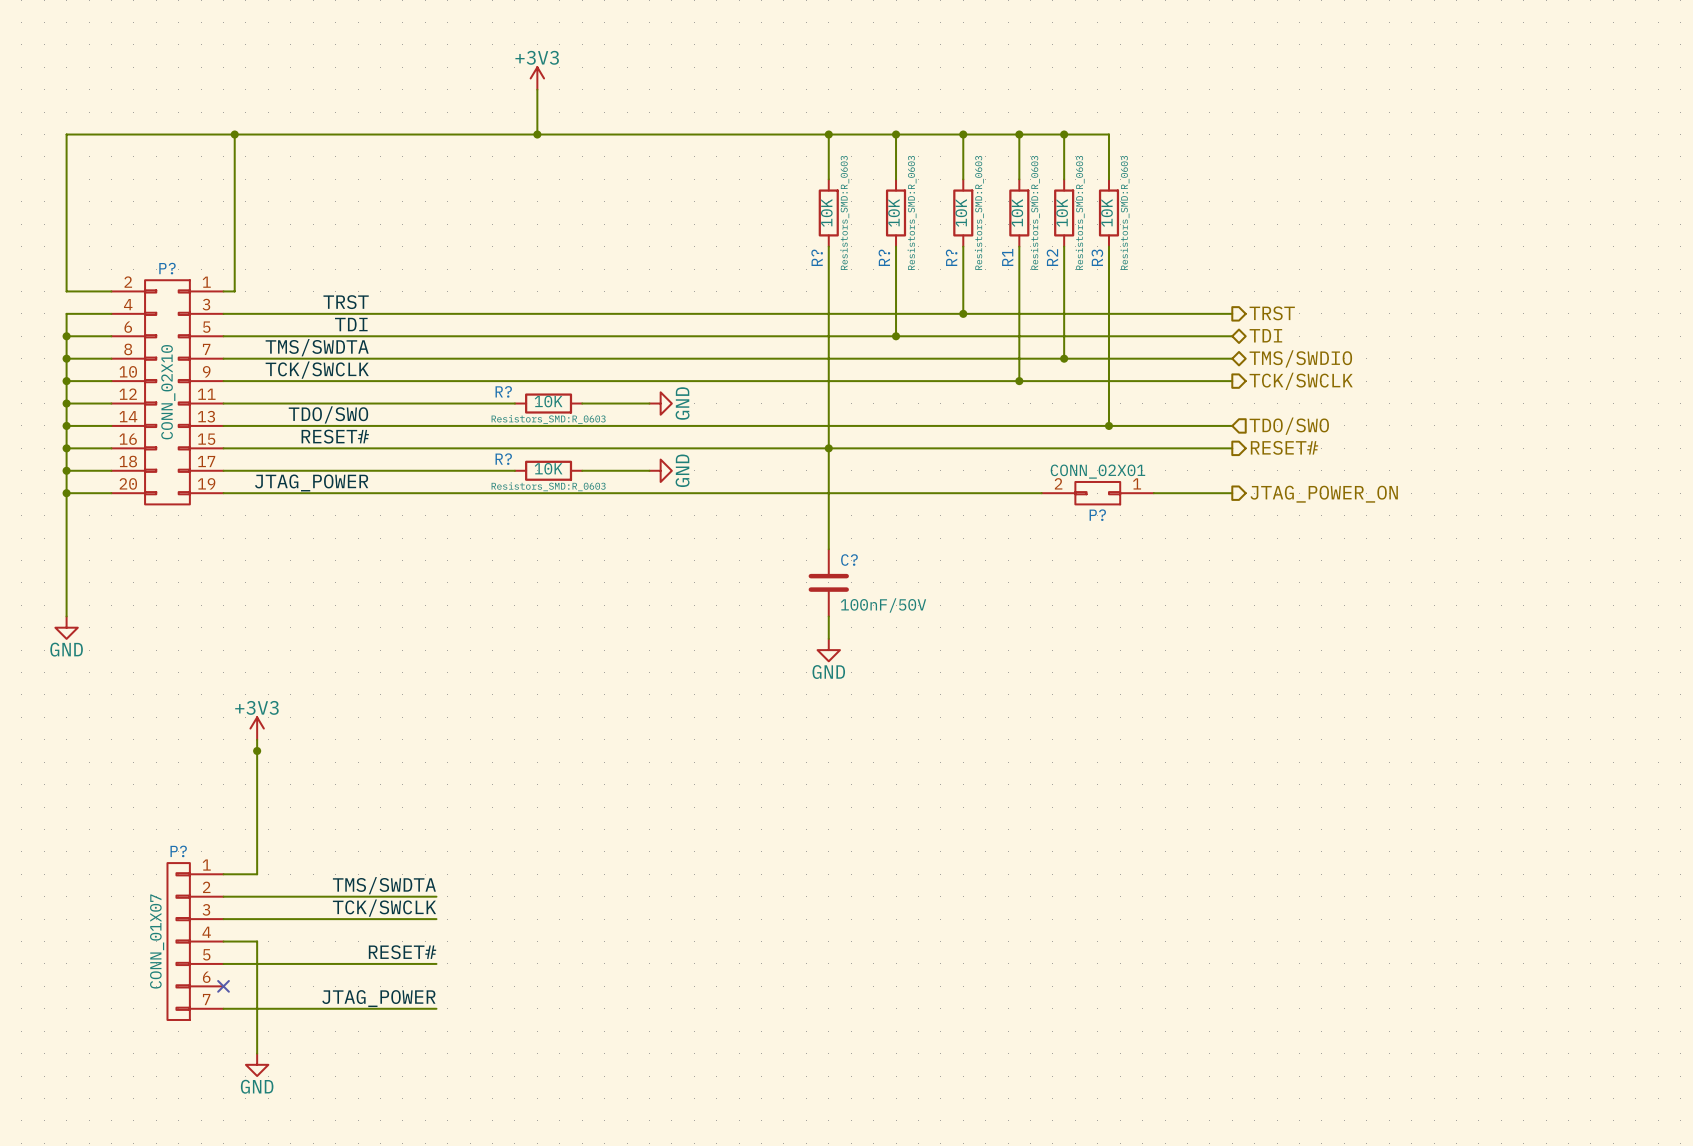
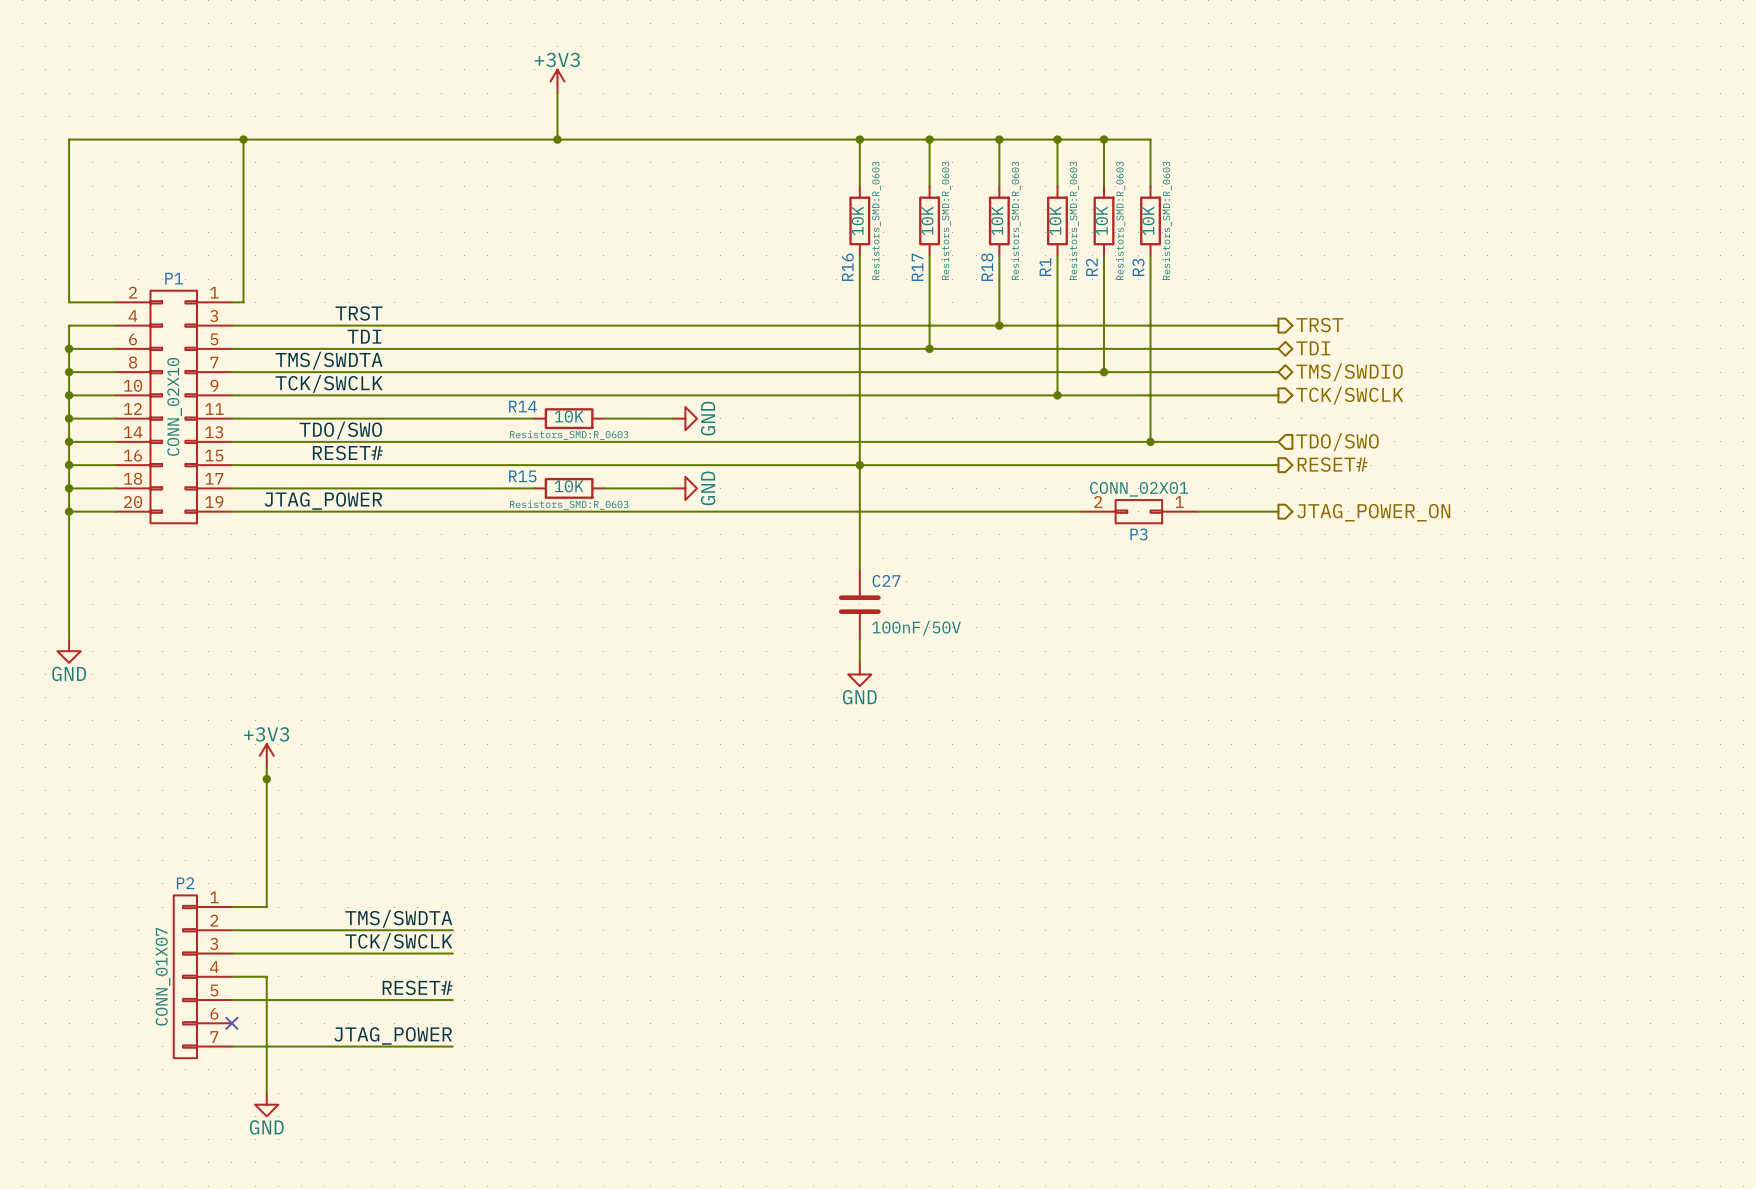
R? name: R? (817, 257) -> R16 (847, 267)
R? name: R? (884, 257) -> R17 (917, 267)
R? name: R? (951, 257) -> R18 (987, 267)
P? name: P? (167, 268) -> P1 (174, 278)
R? name: R? (503, 391) -> R14 (523, 406)
R? name: R? (503, 459) -> R15 (522, 476)
P? name: P? (1097, 515) -> P3 (1138, 534)
C? name: C? (849, 560) -> C27 (886, 580)
P? name: P? (178, 851) -> P2 (185, 883)

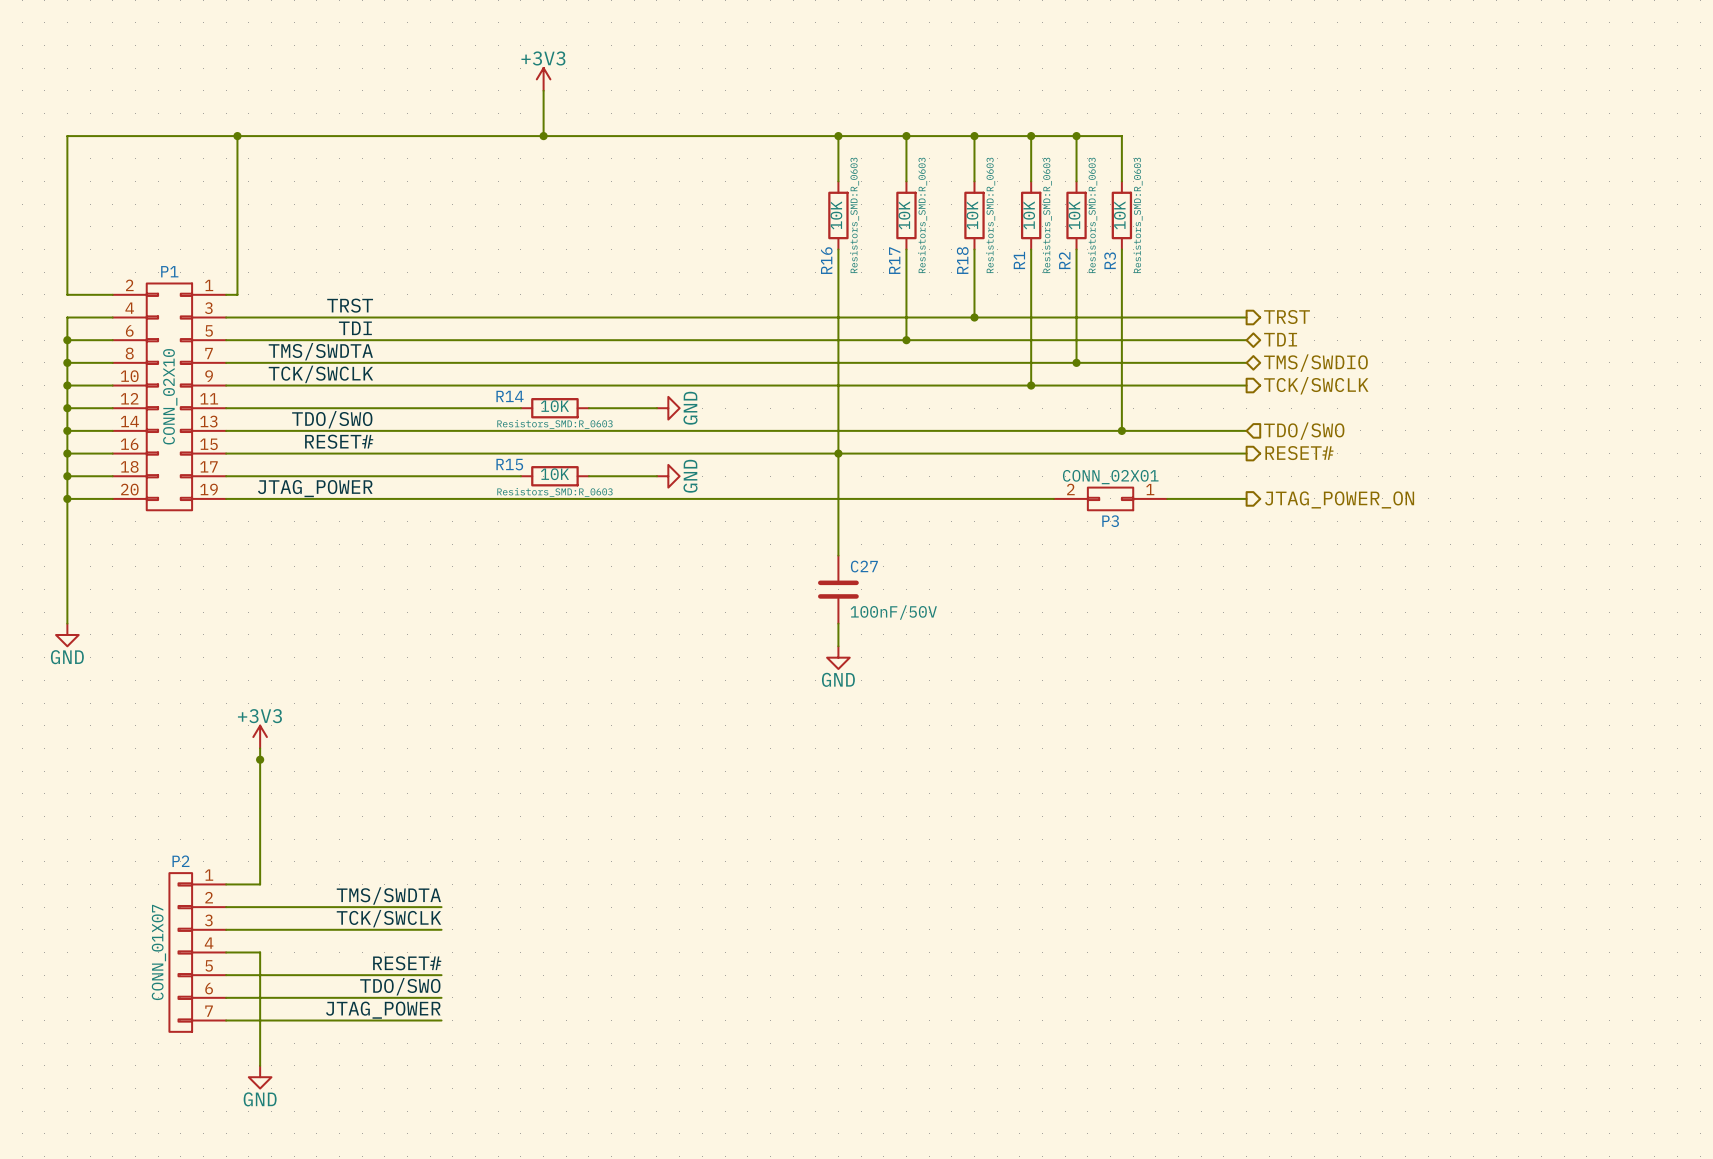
label: none -> TDO/SWO (400, 986)
wire: none -> (226, 997) (441, 997)
no-connect mark: (231, 1023) -> none

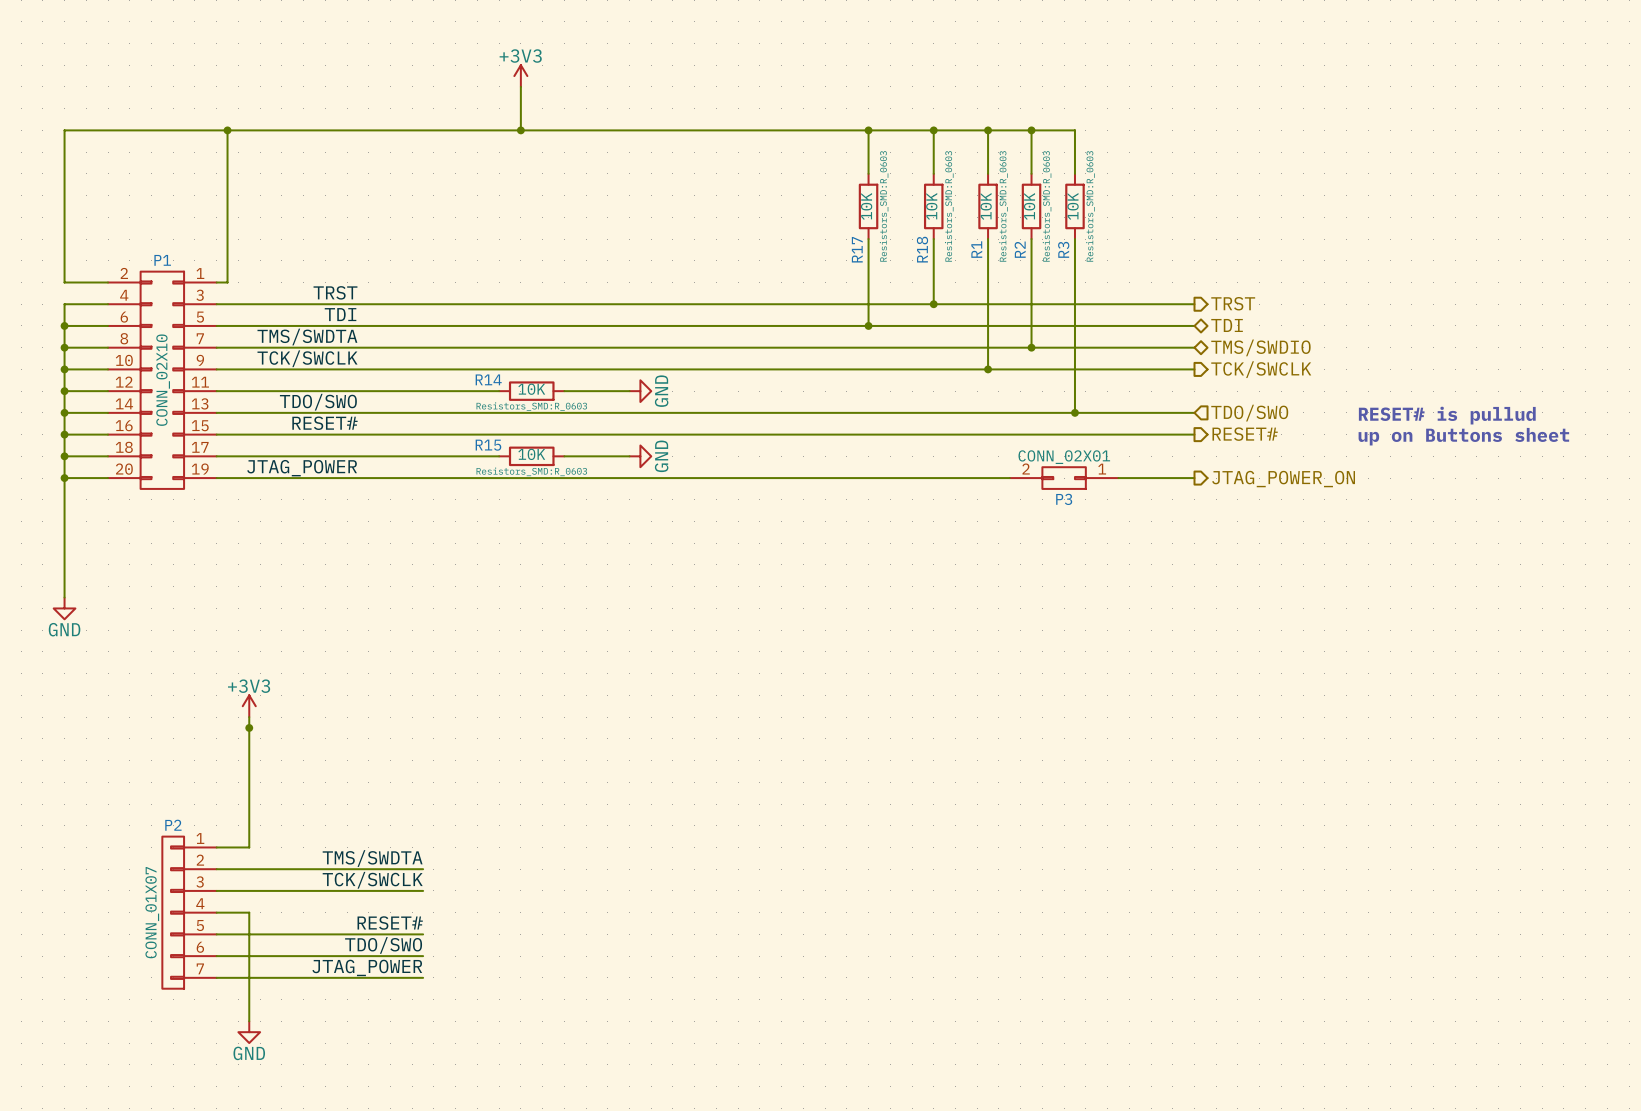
wire: (838, 136) (838, 181) -> none
junction: (838, 136) -> none
R16: 10K (838, 215) -> none
wire: (838, 249) (838, 555) -> none
text: none -> RESET# is pullud (1447, 415)
junction: (838, 453) -> none
text: none -> up on Buttons sheet (1463, 436)
C27: 100nF/50V (838, 589) -> none
wire: (838, 623) (838, 646) -> none
power symbol: GND (838, 657) -> none

